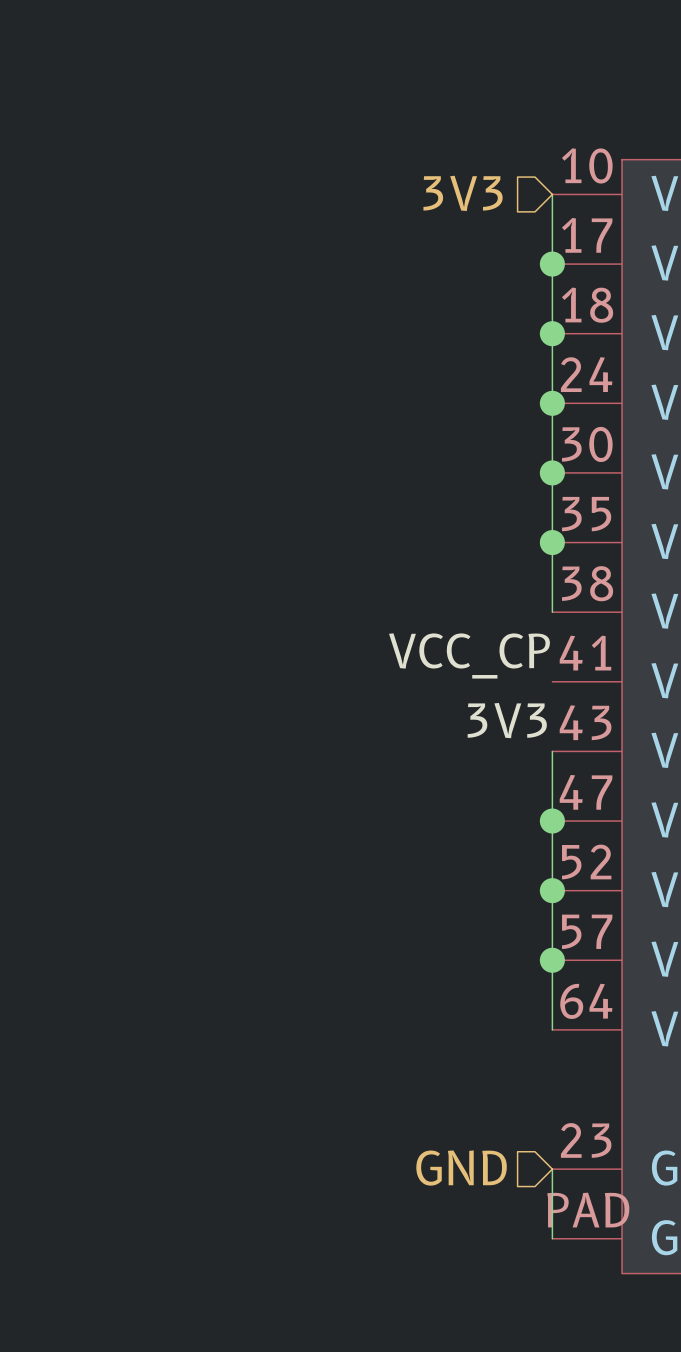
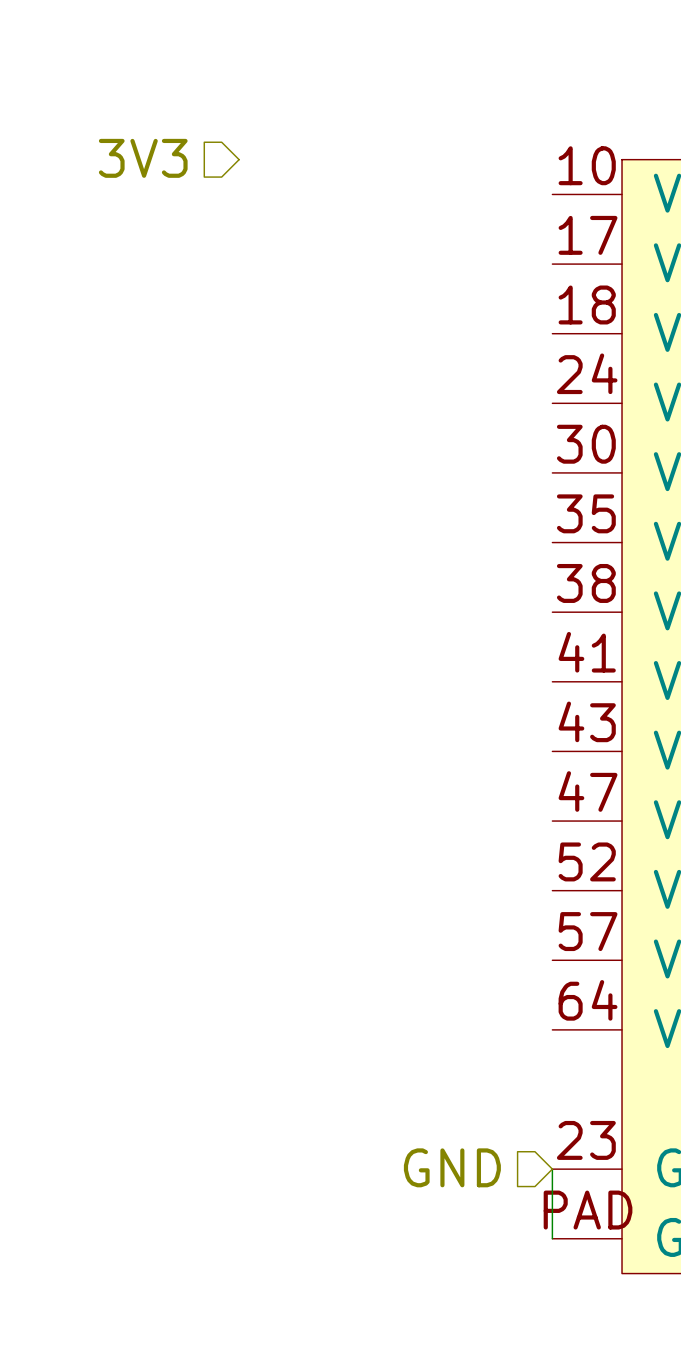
hierarchical label position: 3V3 (463, 193) -> 3V3 (143, 158)
wire: (552, 194) (552, 612) -> none
junction: (552, 264) -> none
junction: (552, 333) -> none
junction: (552, 403) -> none
junction: (552, 472) -> none
junction: (552, 542) -> none
label: VCC_CP (469, 655) -> none
label: 3V3 (507, 720) -> none
wire: (552, 751) (552, 1029) -> none
junction: (552, 821) -> none
junction: (552, 890) -> none
junction: (552, 960) -> none

